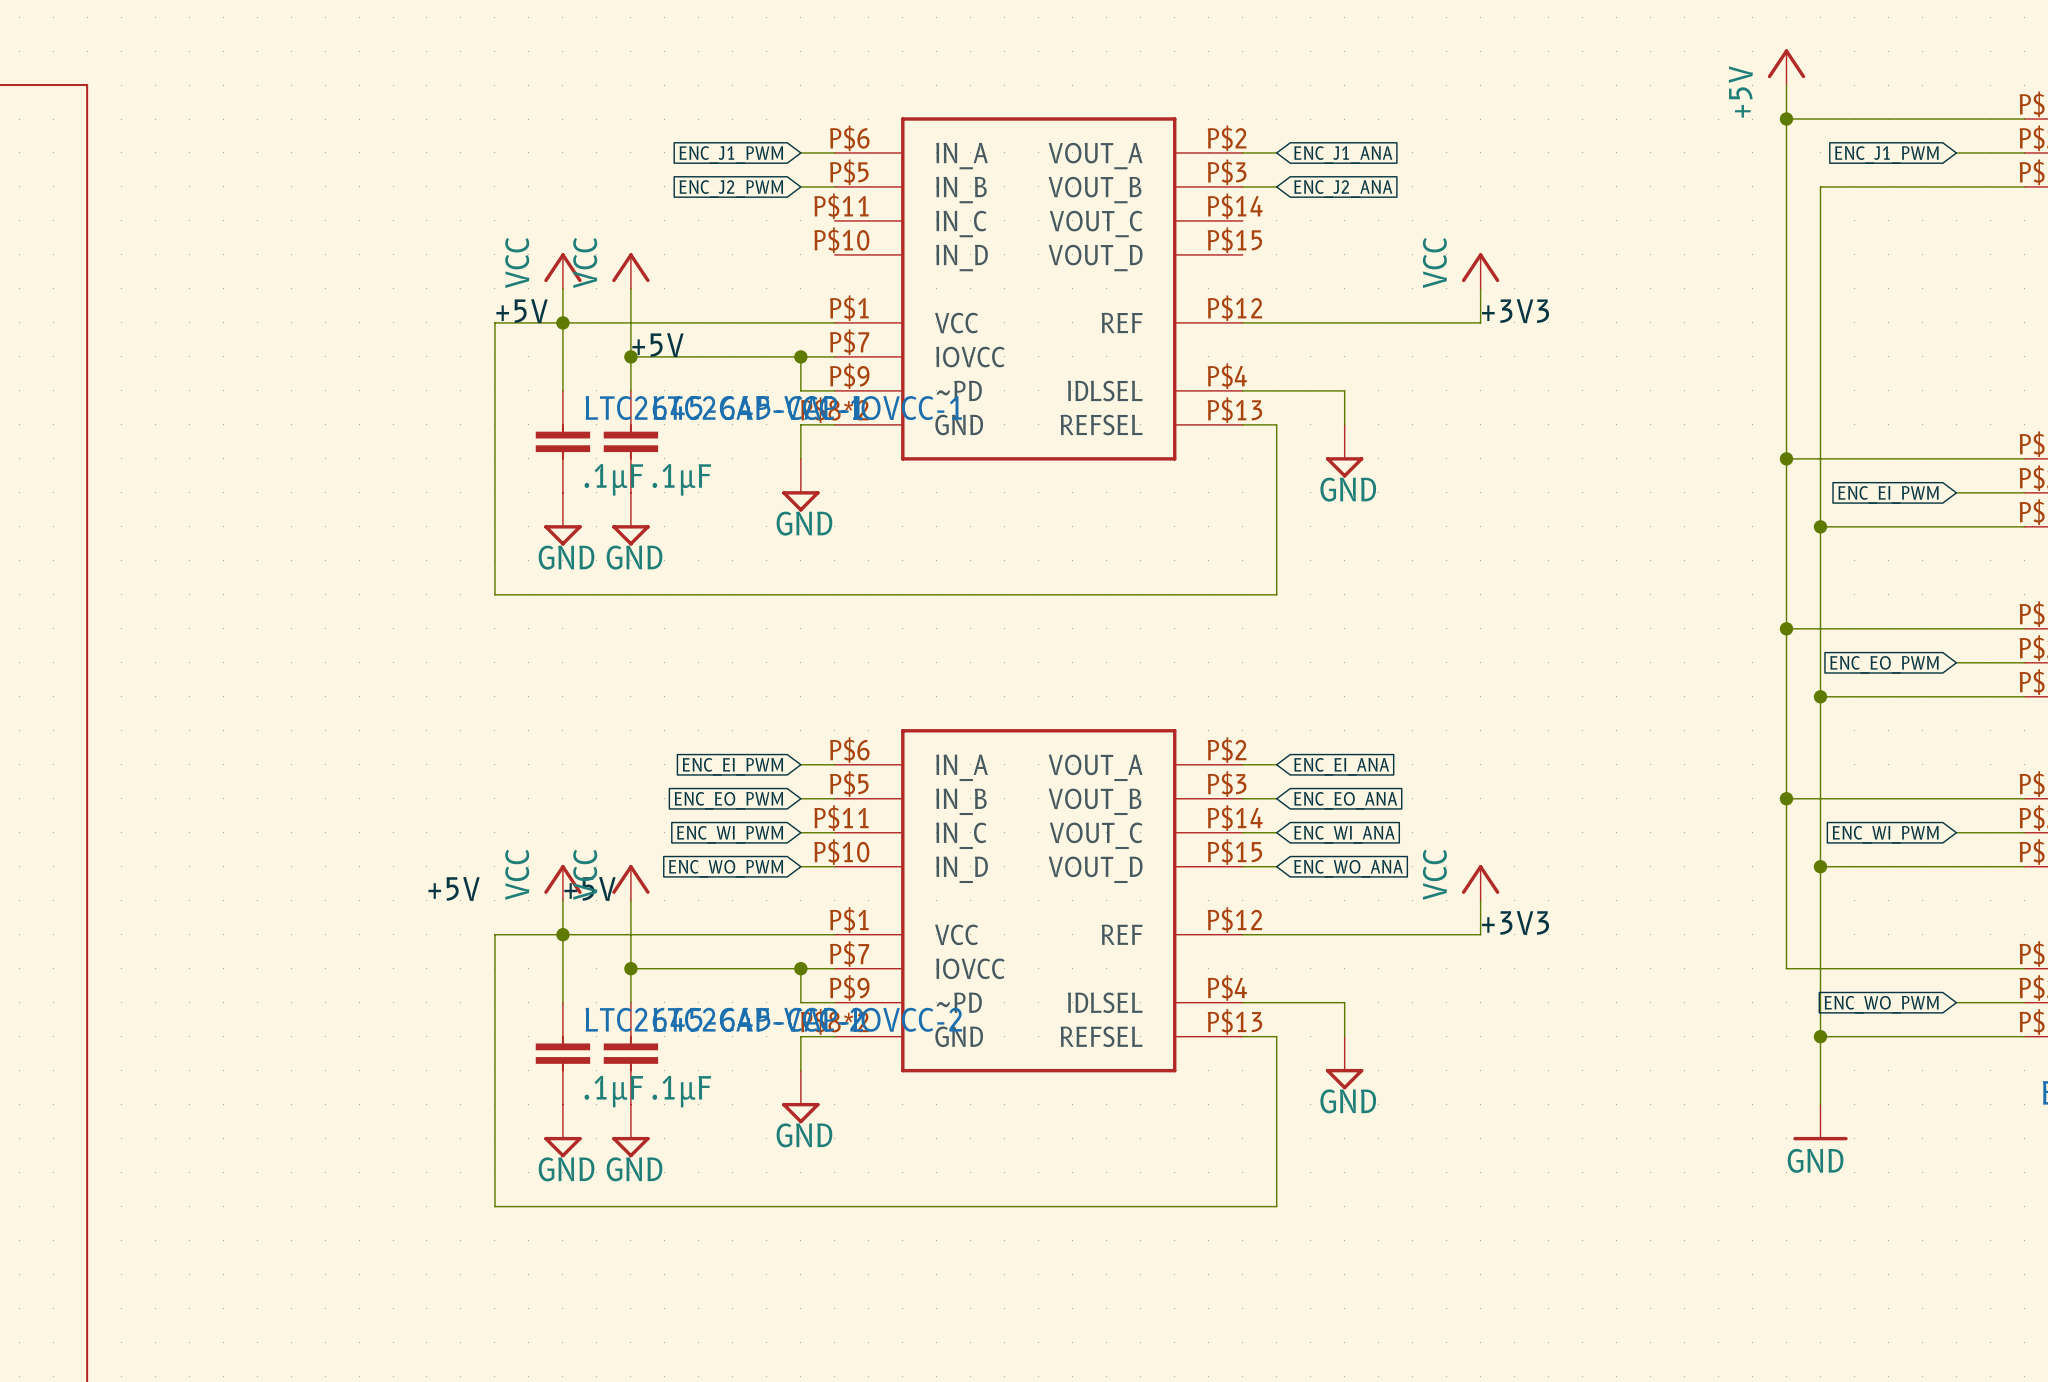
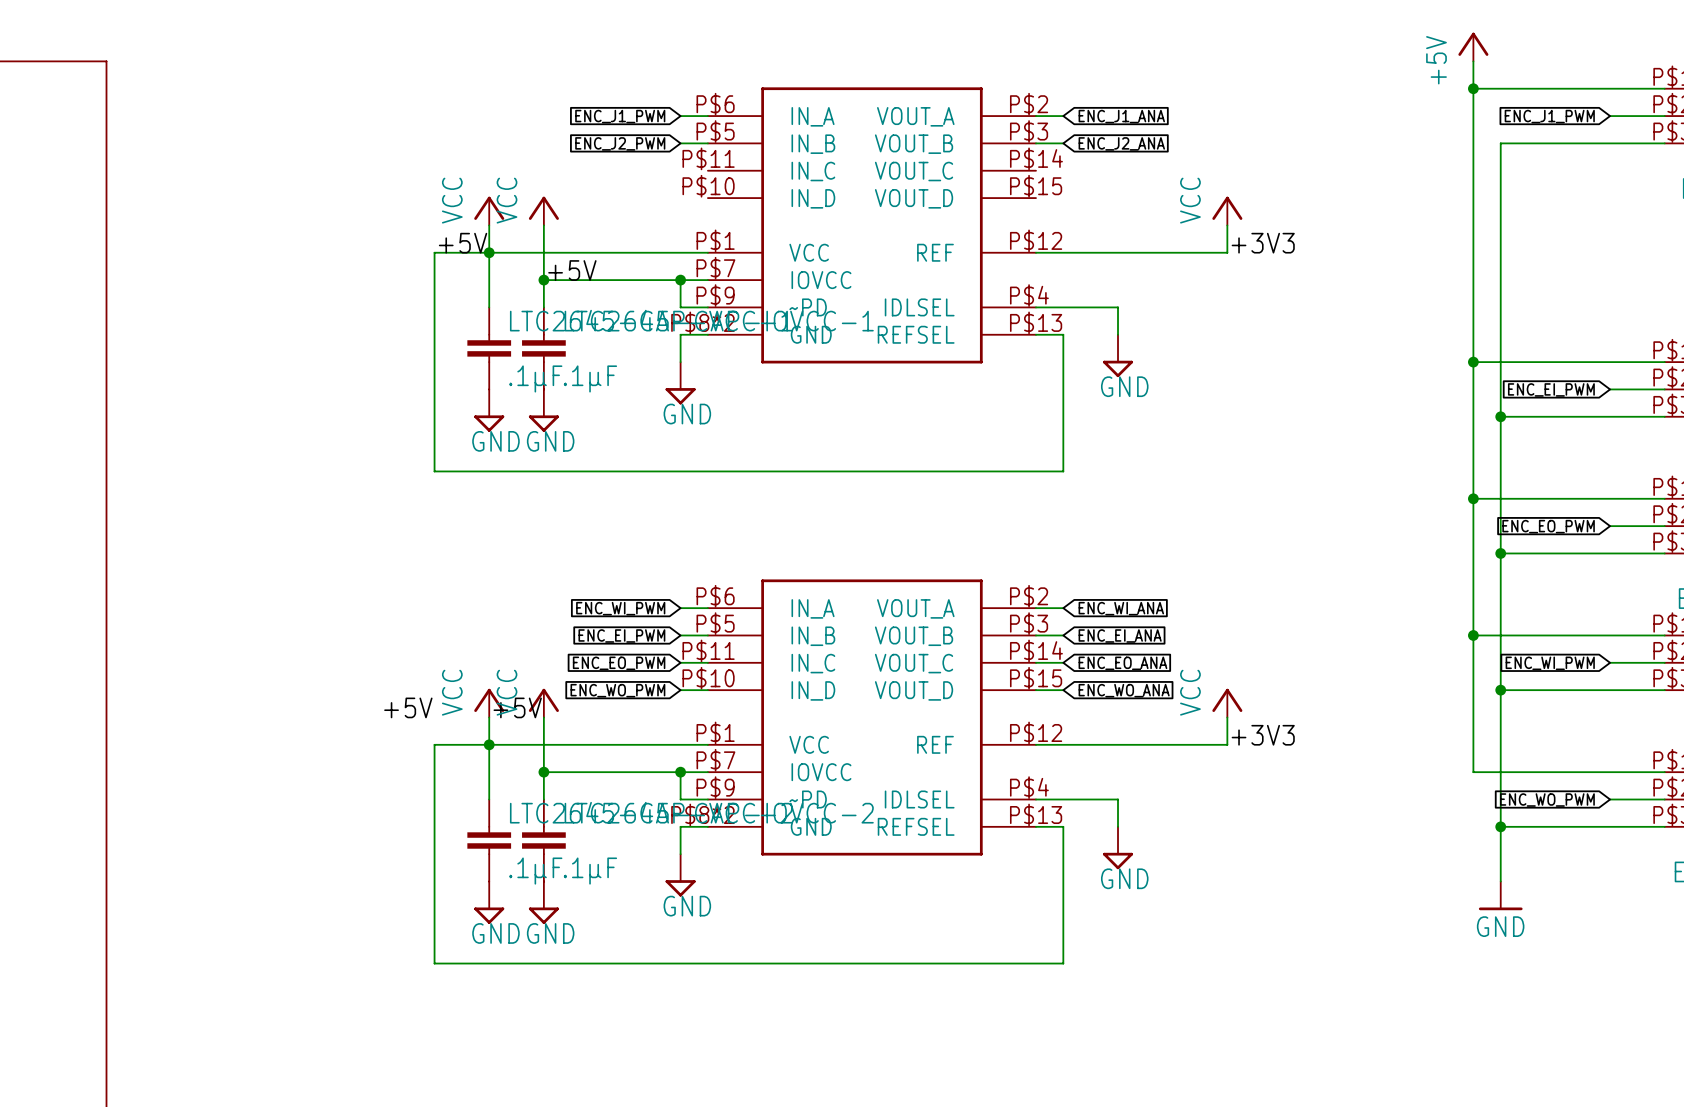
global label: ENC_EI_PWM (732, 766) -> ENC_WI_PWM (620, 608)
global label: ENC_EI_ANA (1341, 766) -> ENC_WI_ANA (1121, 608)
global label: ENC_EO_PWM (728, 800) -> ENC_EI_PWM (621, 636)
global label: ENC_EO_ANA (1345, 800) -> ENC_EI_ANA (1120, 636)
global label: ENC_WI_PWM (730, 834) -> ENC_EO_PWM (619, 663)
global label: ENC_WI_ANA (1344, 834) -> ENC_EO_ANA (1122, 663)

